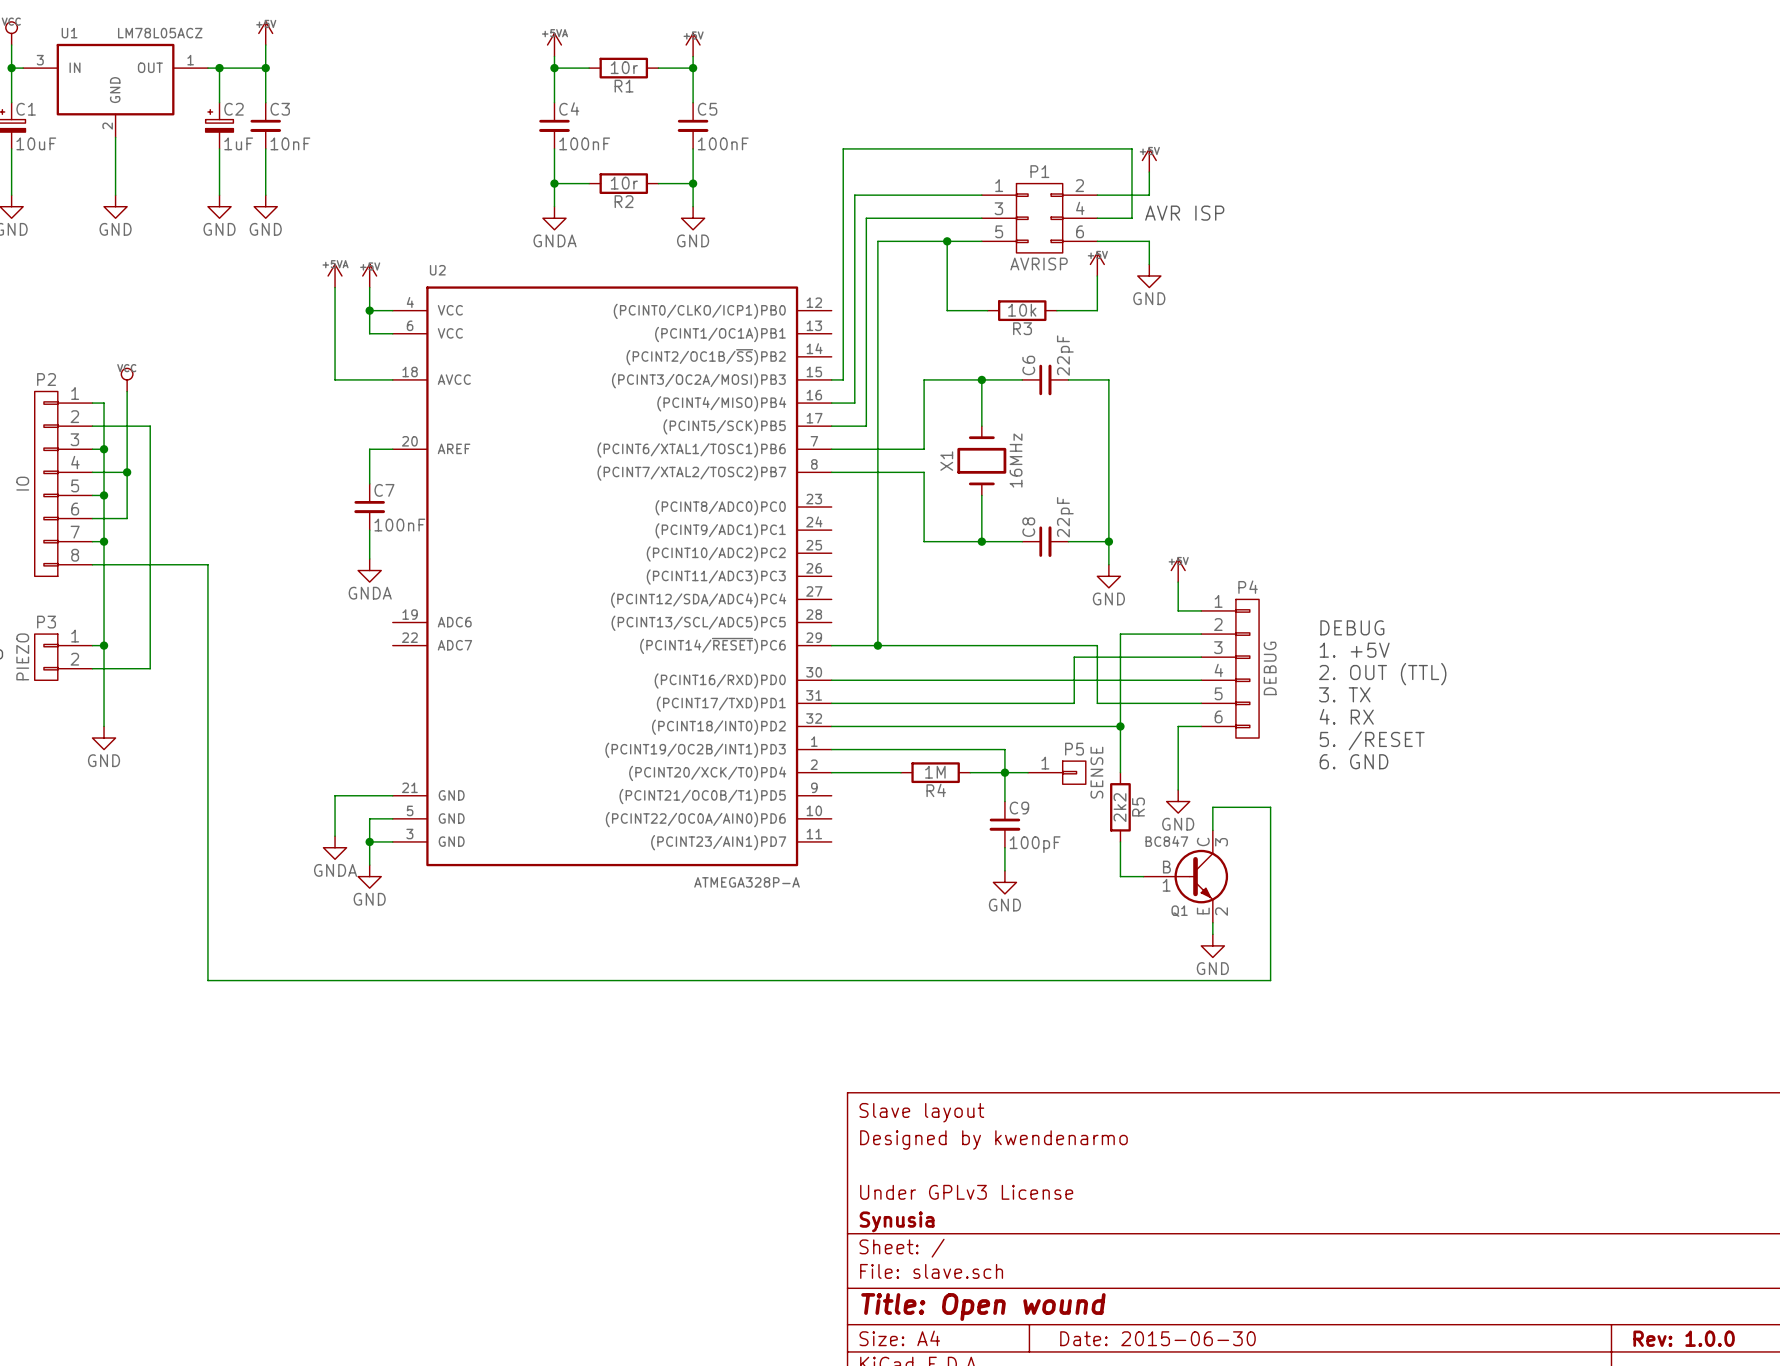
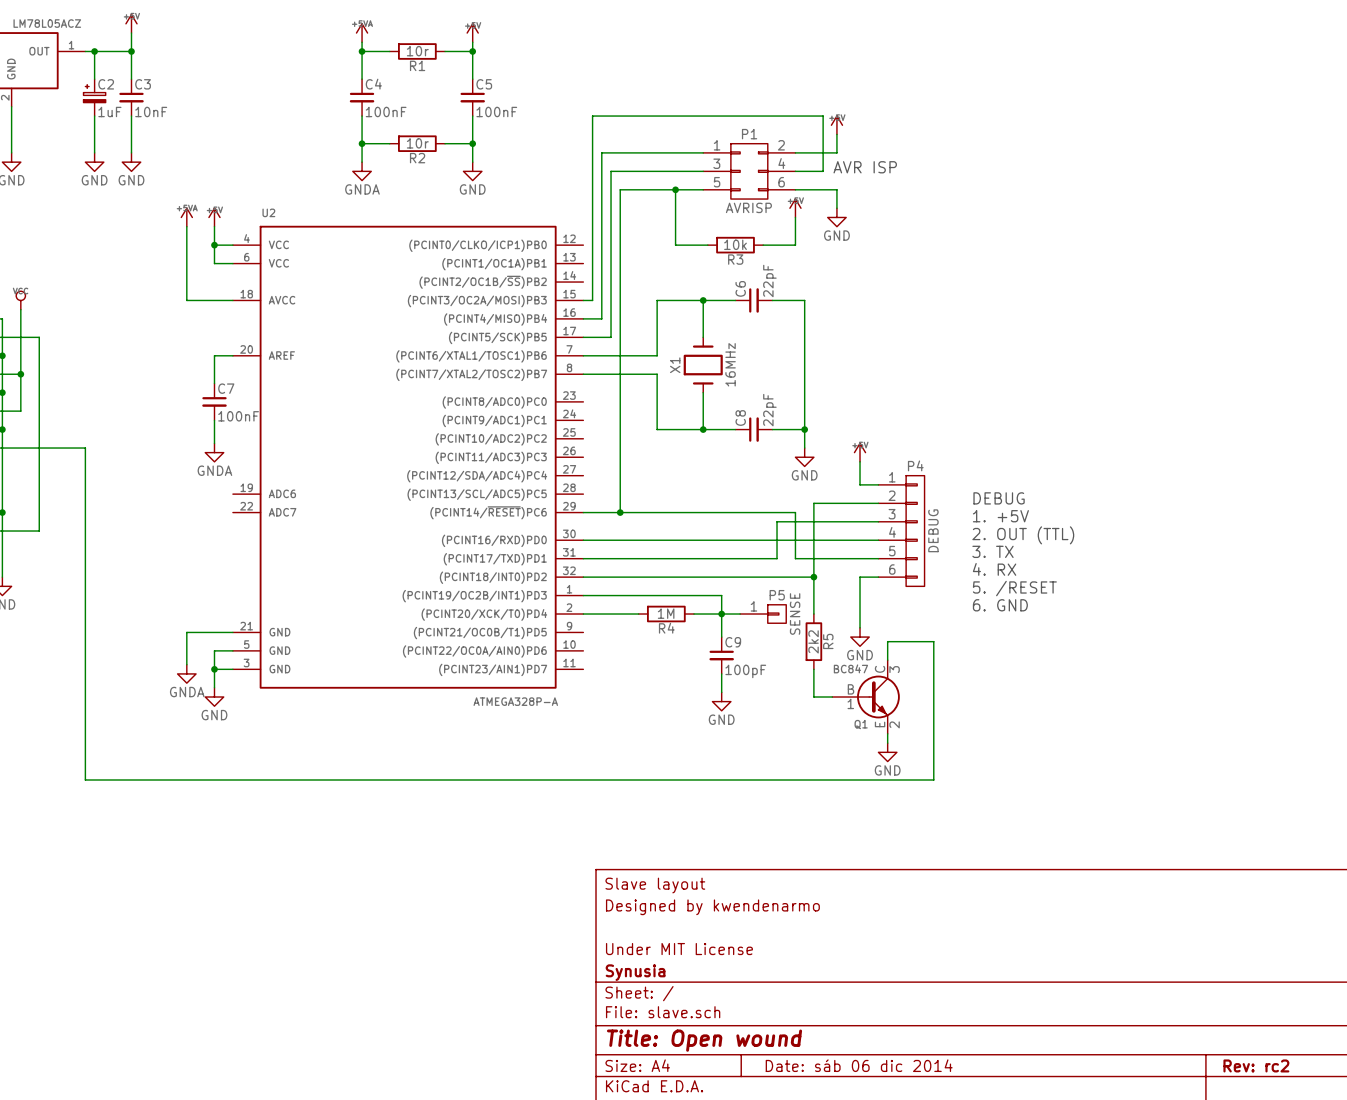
title block: Under GPLv3 License (966, 1192) -> Under MIT License (679, 949)
title block: Date: 2015-06-30 (1157, 1338) -> Date: sáb 06 dic 2014 (859, 1065)
title block: Rev: 1.0.0 (1684, 1338) -> Rev: rc2 (1256, 1065)

